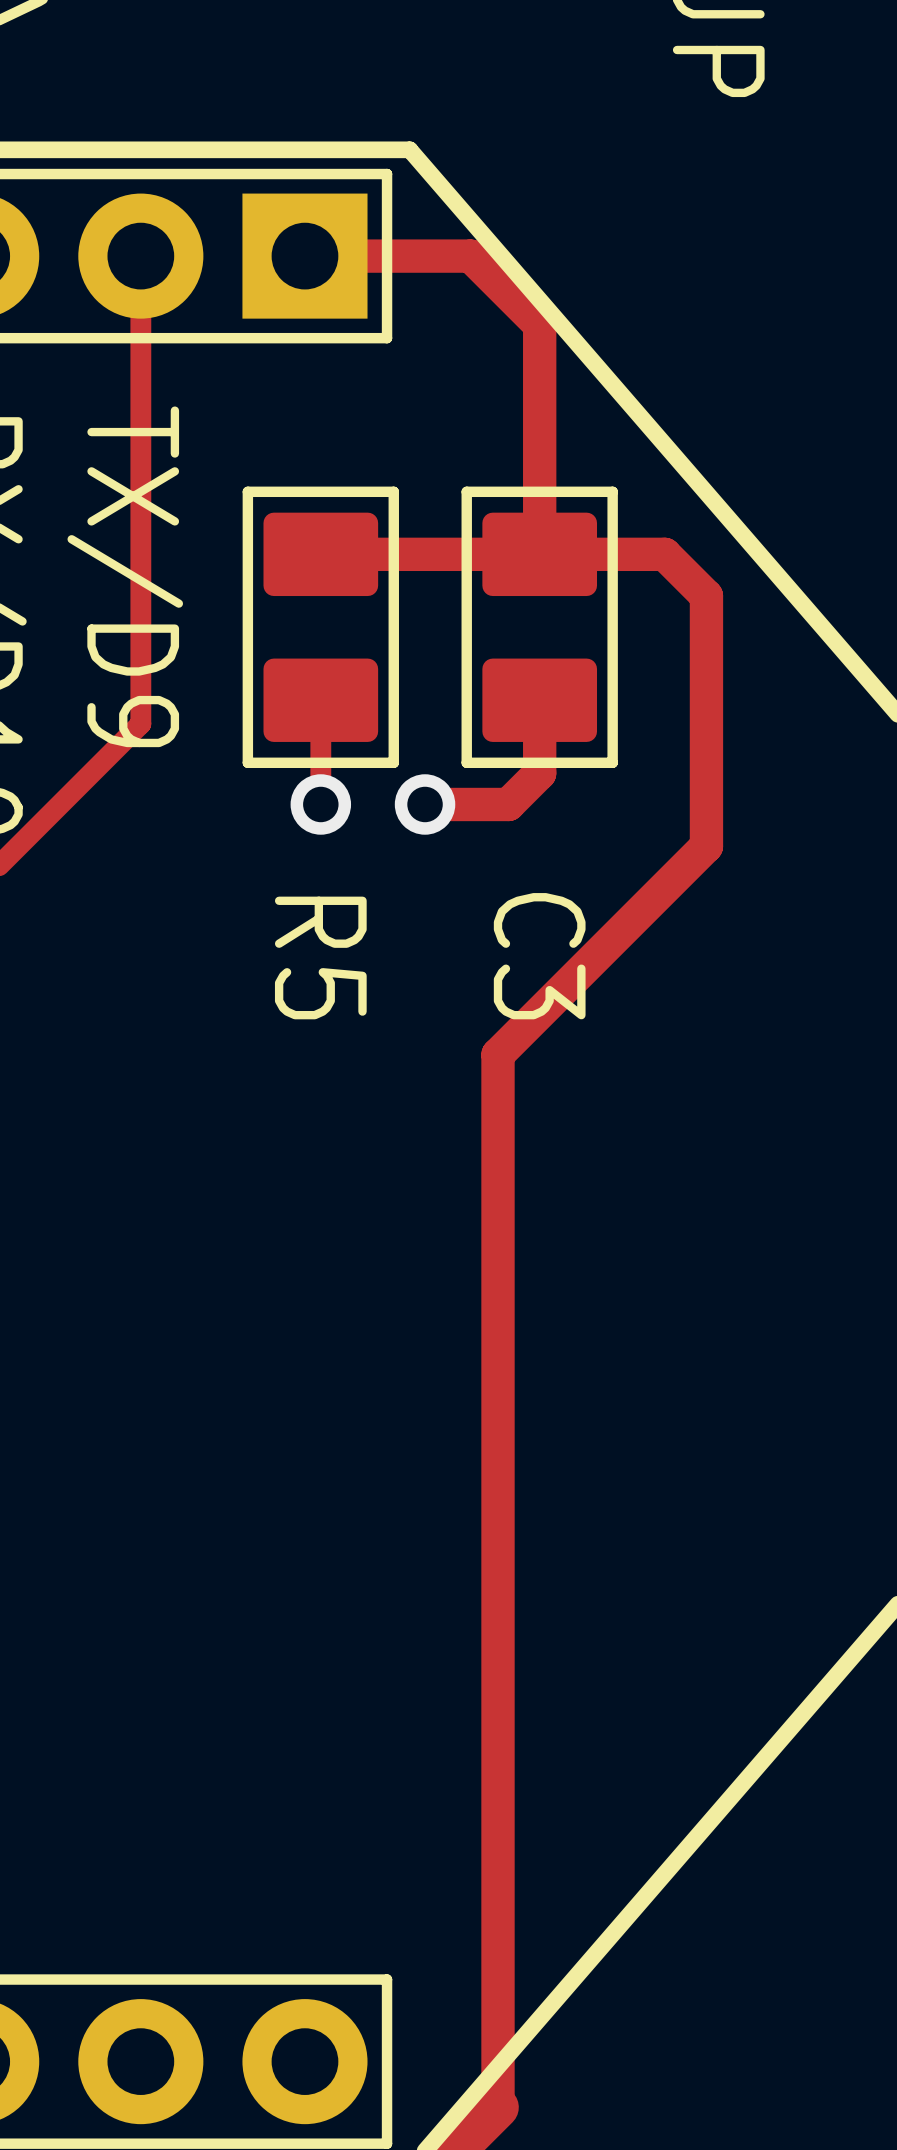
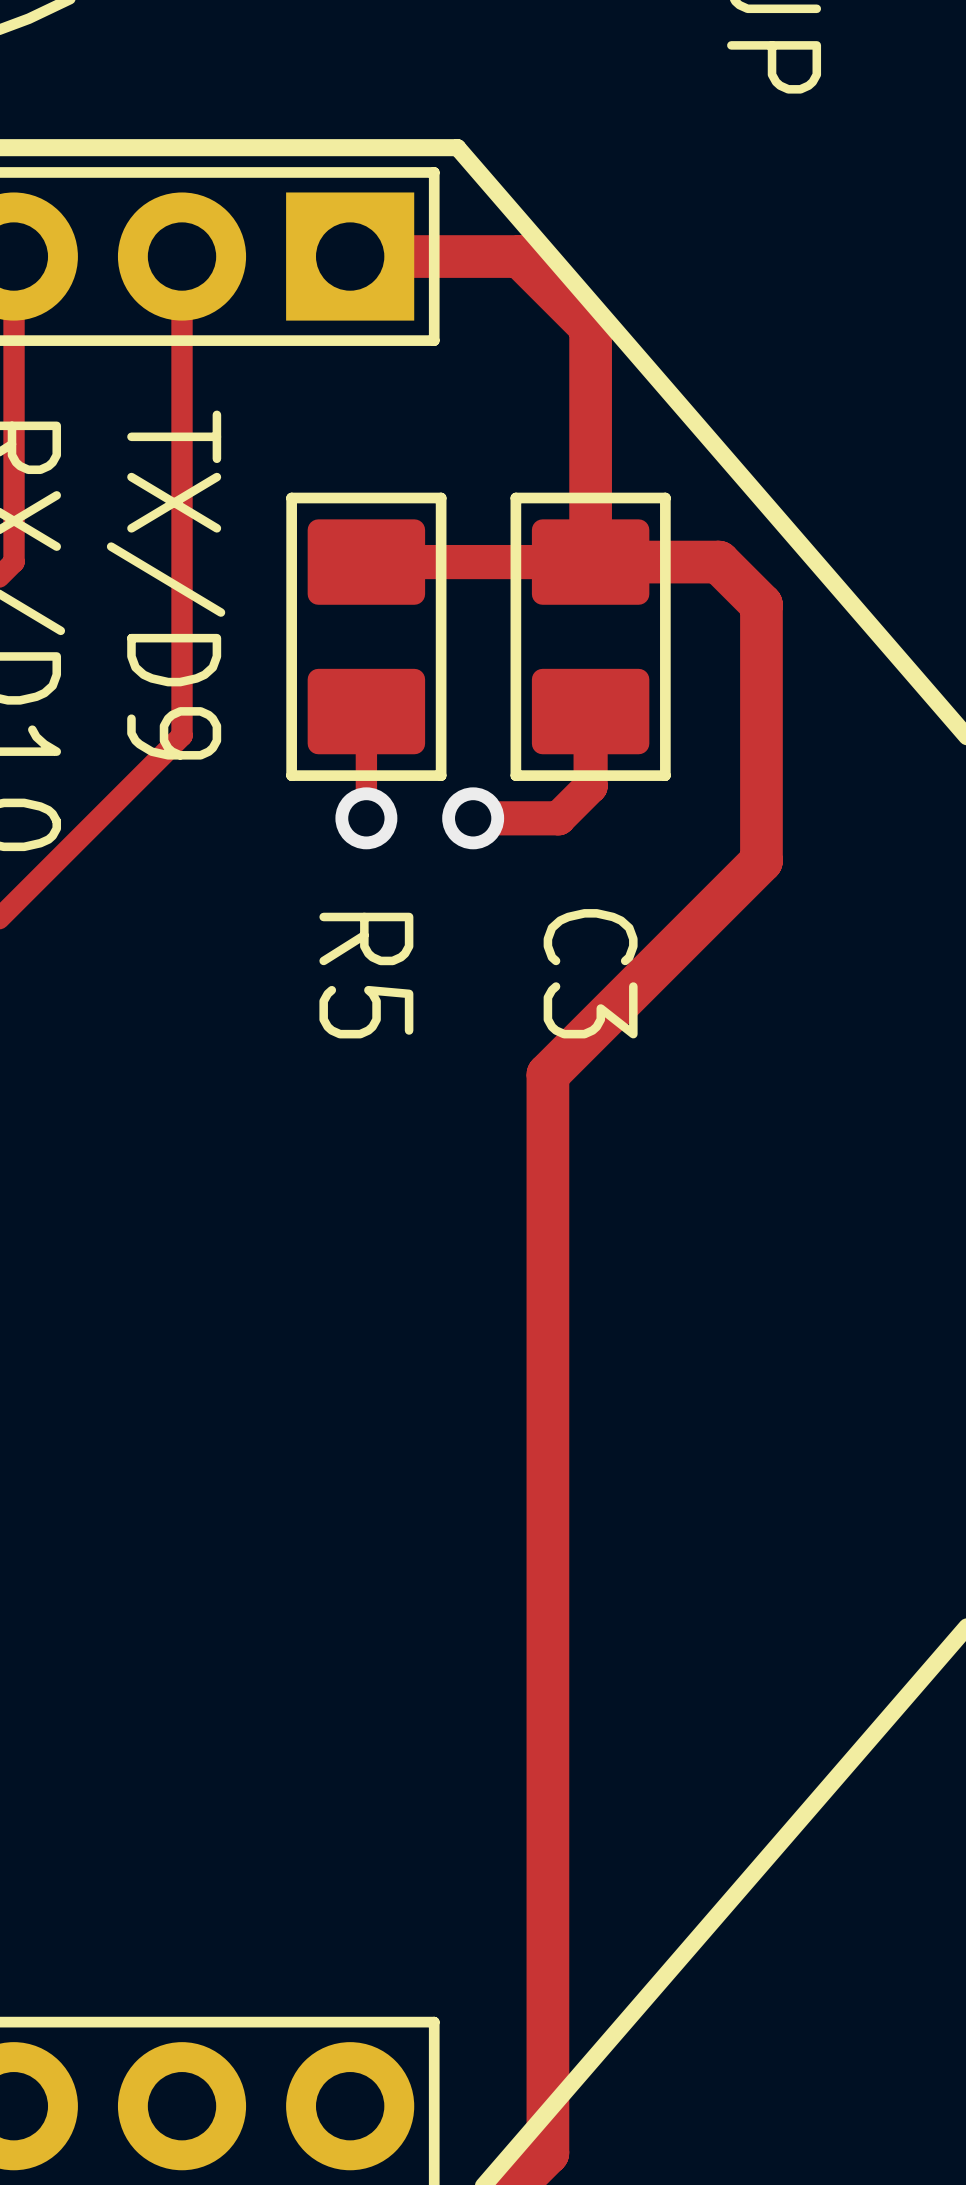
track width: thin (304, 256) (470, 256) (539, 325) (539, 554) (664, 554) (706, 596) (706, 846) (498, 1054) (498, 2107) -> thick (350, 256) (519, 256) (590, 327) (590, 562) (718, 562) (761, 604) (761, 861) (547, 1074) (547, 2153)

